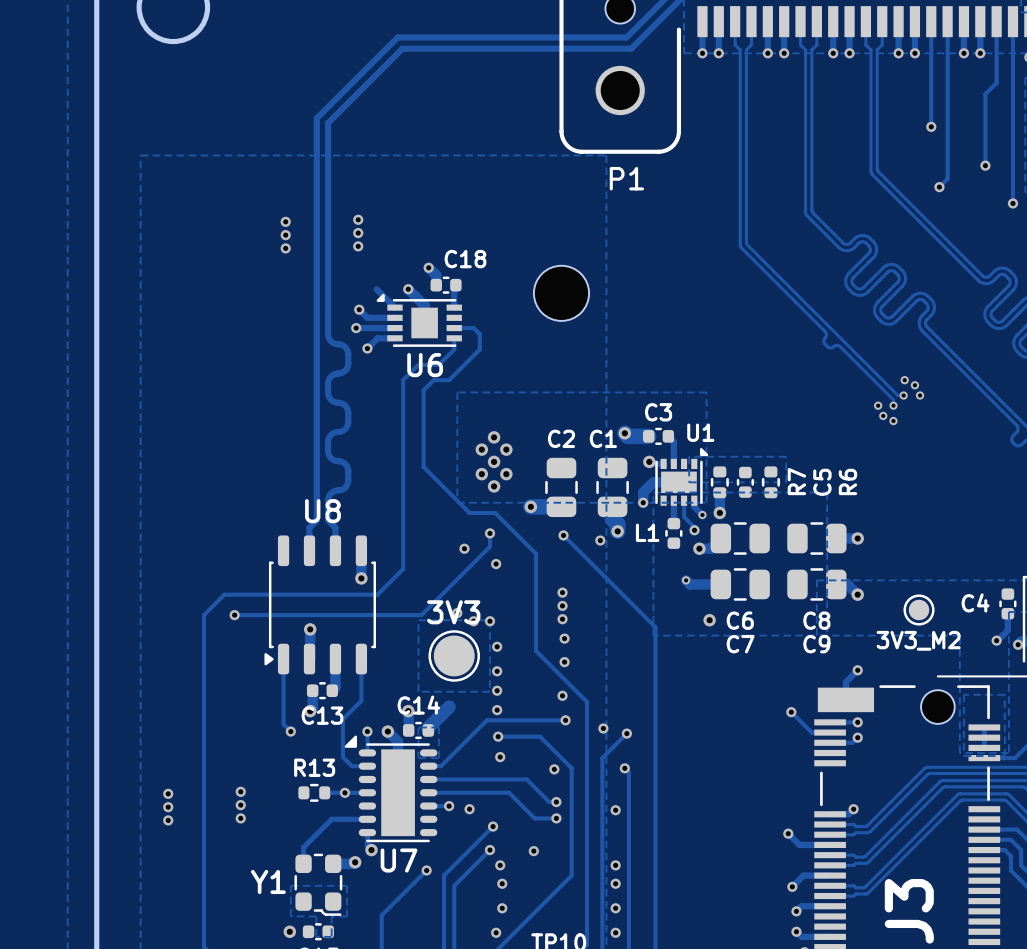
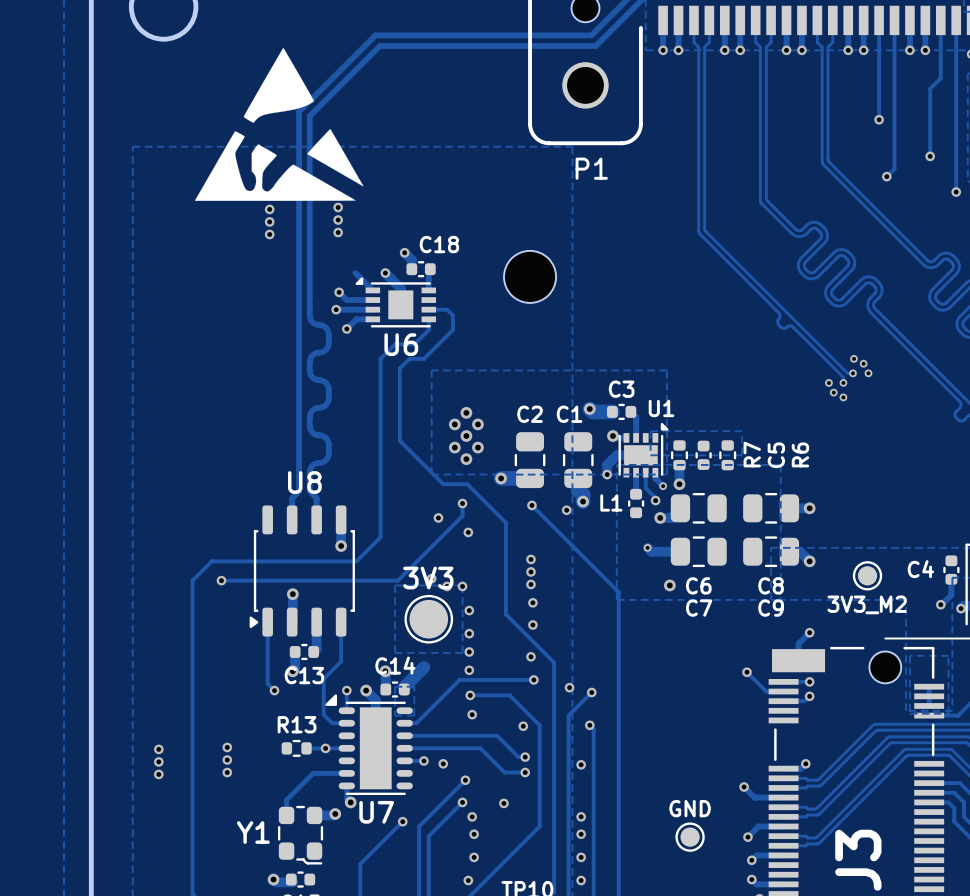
drawing: none -> [194, 47, 364, 201]
zone outline: (290, 885) (346, 885) (346, 916) (331, 916) (331, 936) (316, 936) (316, 916) (290, 916) (290, 885) -> none
GND: none -> (690, 837)
track: none -> (275, 882) (293, 882)

